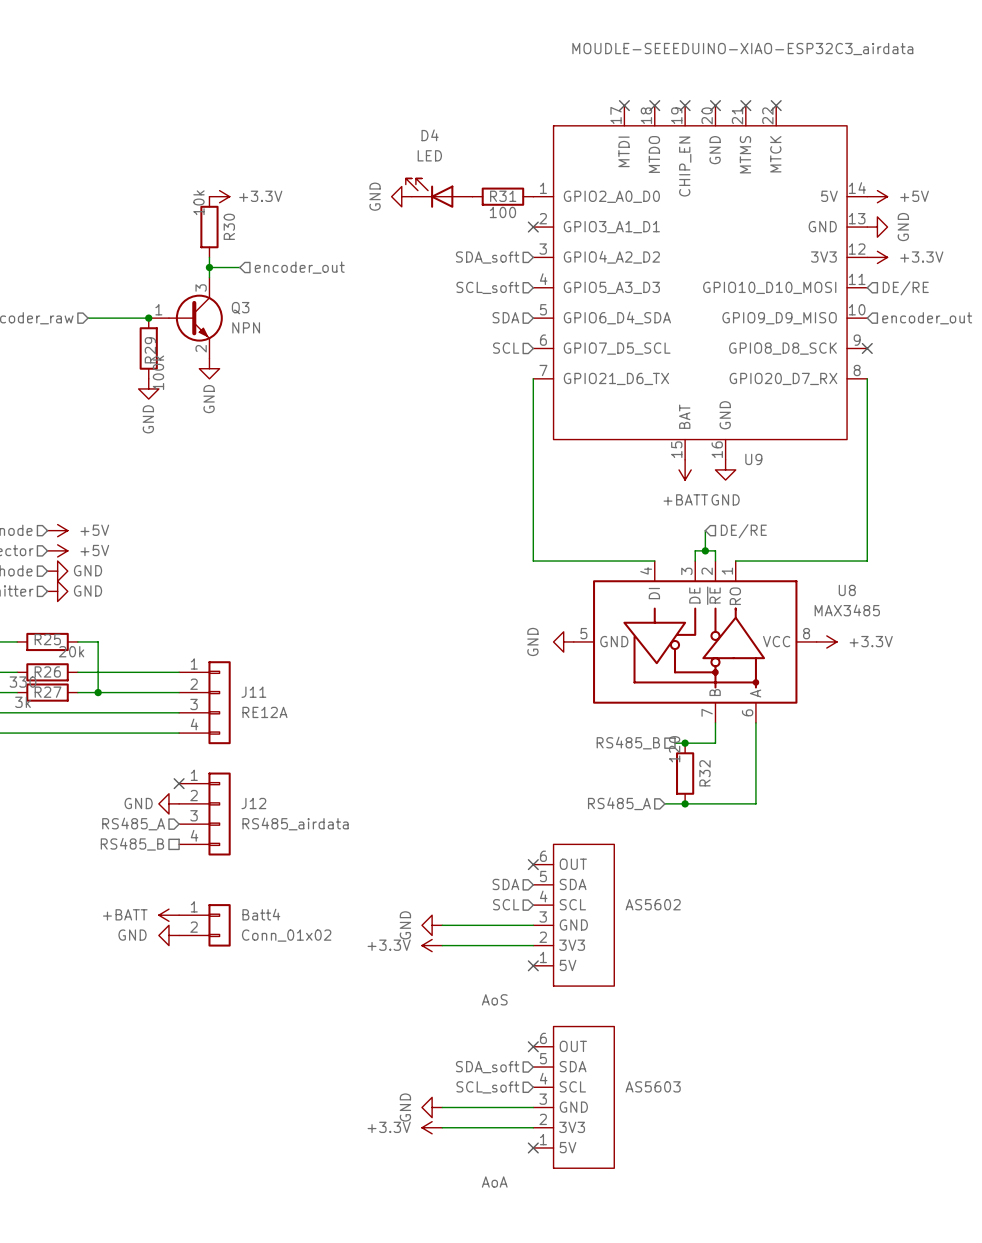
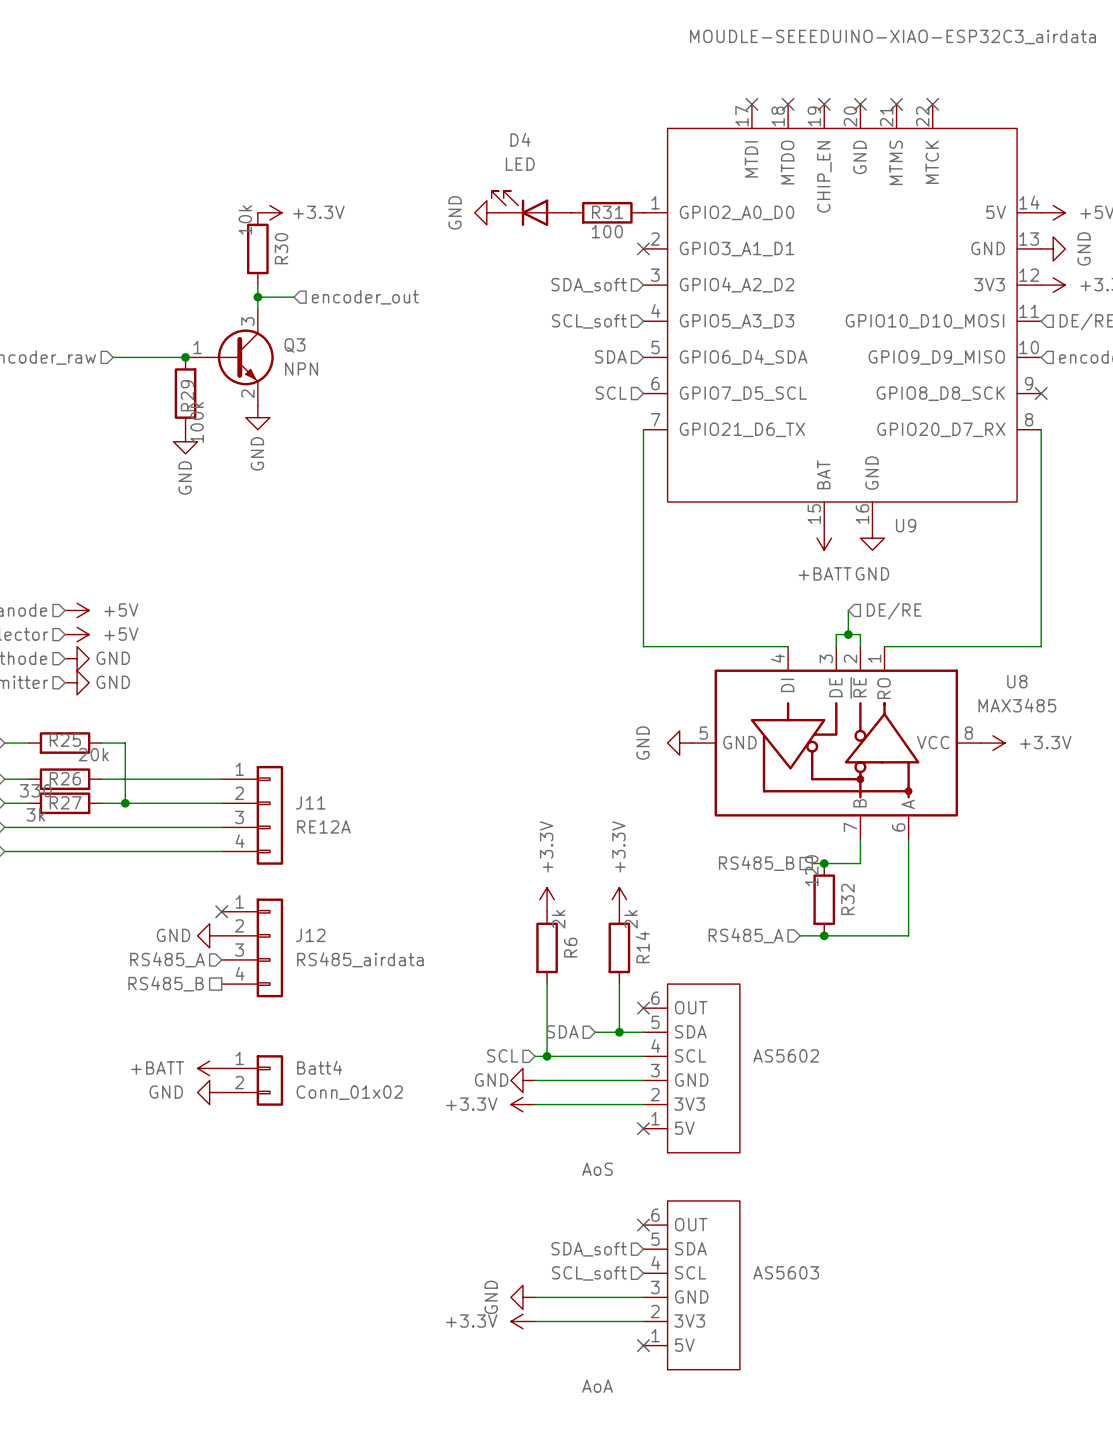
power symbol: none -> +3.3V (547, 899)
power symbol: none -> +3.3V (619, 899)
R6: none -> 2k (547, 947)
R14: none -> 2k (619, 947)
wire: none -> (547, 984) (547, 1056)
wire: none -> (619, 984) (619, 1032)
wire: none -> (595, 1032) (643, 1032)
hierarchical label position: SDA (505, 884) -> SDA (562, 1031)
junction: none -> (619, 1032)
hierarchical label position: SCL (506, 904) -> SCL (502, 1055)
wire: none -> (535, 1056) (643, 1056)
junction: none -> (547, 1056)
power symbol text rotation: 0° (405, 925) -> 90° clockwise (491, 1080)

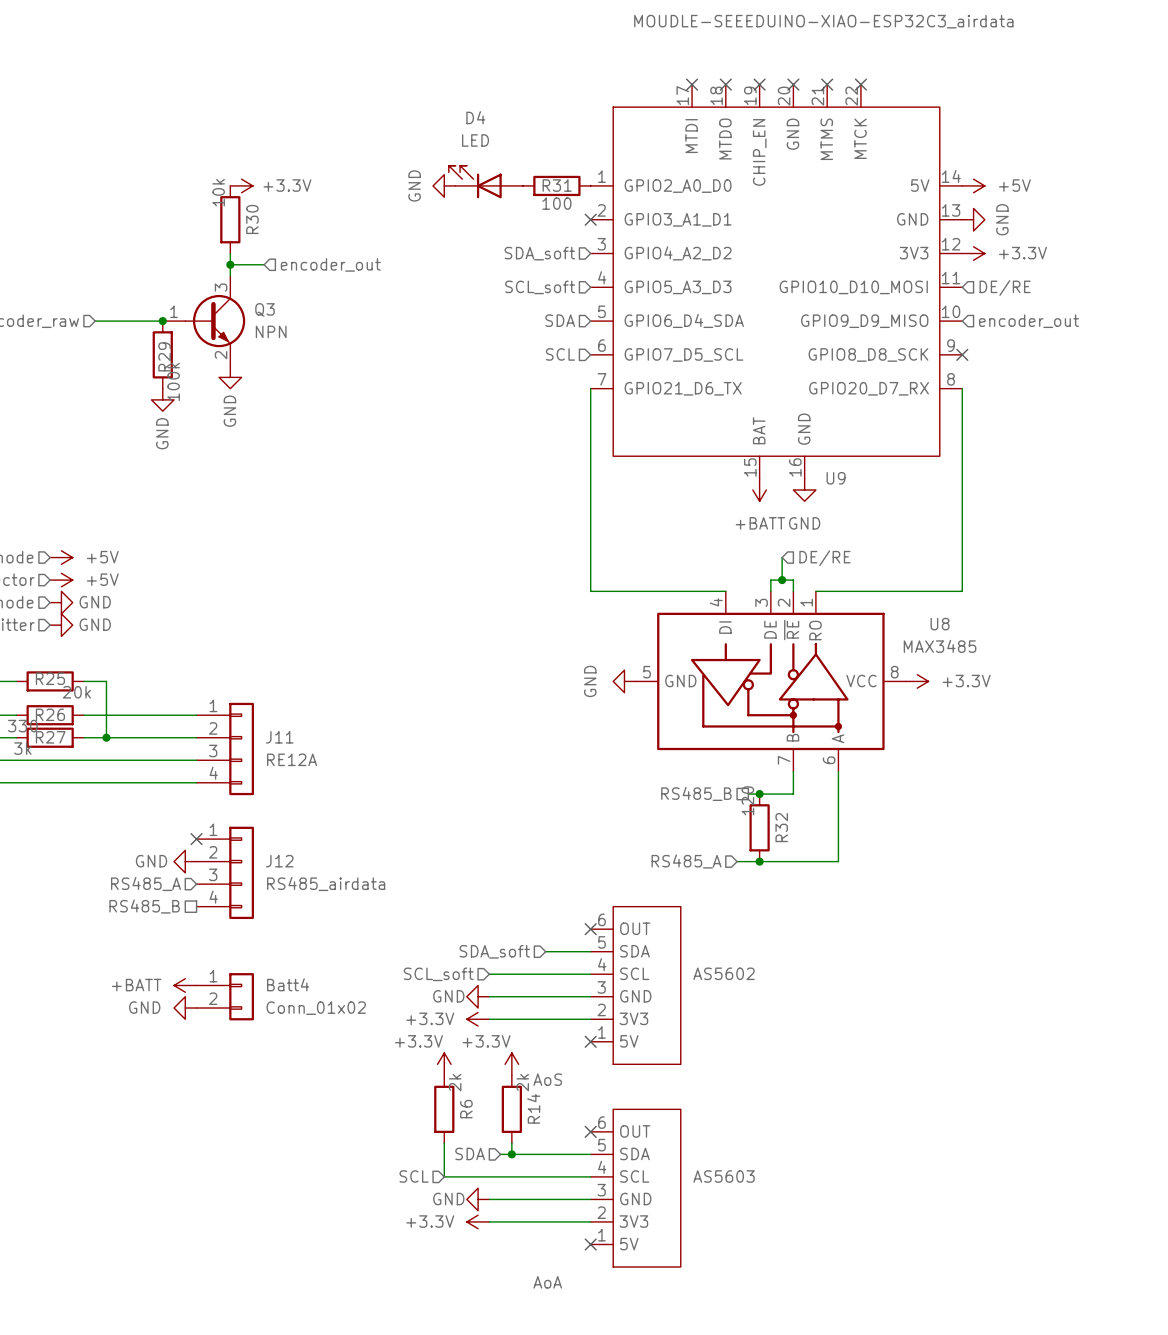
power symbol: +3.3V (547, 899) -> none
power symbol: +3.3V (619, 899) -> none
R6 position: (547, 947) -> (444, 1109)
R14 position: (619, 947) -> (511, 1109)
wire: (547, 984) (547, 1056) -> none
wire: (619, 984) (619, 1032) -> none
hierarchical label: SDA (562, 1031) -> SDA_soft (494, 951)
junction: (619, 1032) -> none
hierarchical label: SCL (502, 1055) -> SCL_soft (438, 974)
junction: (547, 1056) -> none
power symbol: none -> +3.3V (444, 1064)
power symbol: none -> +3.3V (511, 1064)
wire: none -> (444, 1143) (444, 1176) (590, 1176)
wire: none -> (511, 1143) (511, 1154)
hierarchical label: none -> SDA (470, 1153)
wire: none -> (500, 1154) (590, 1154)
junction: none -> (511, 1154)
hierarchical label: SDA_soft (589, 1249) -> none
hierarchical label: none -> SCL (414, 1176)
hierarchical label: SCL_soft (589, 1273) -> none
power symbol text rotation: 0° (491, 1297) -> 90° clockwise (448, 1199)

